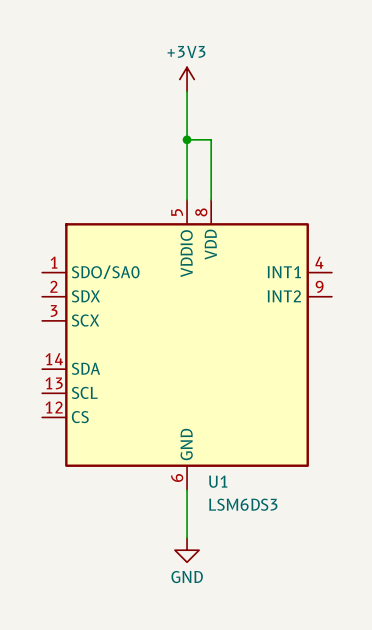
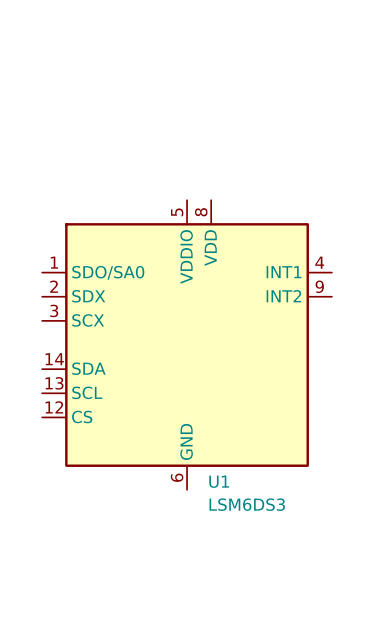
power symbol: +3V3 (187, 79) -> none
wire: (187, 91) (187, 200) -> none
wire: (187, 139) (211, 139) (211, 200) -> none
junction: (187, 139) -> none
wire: (187, 489) (187, 538) -> none
power symbol: GND (187, 550) -> none

